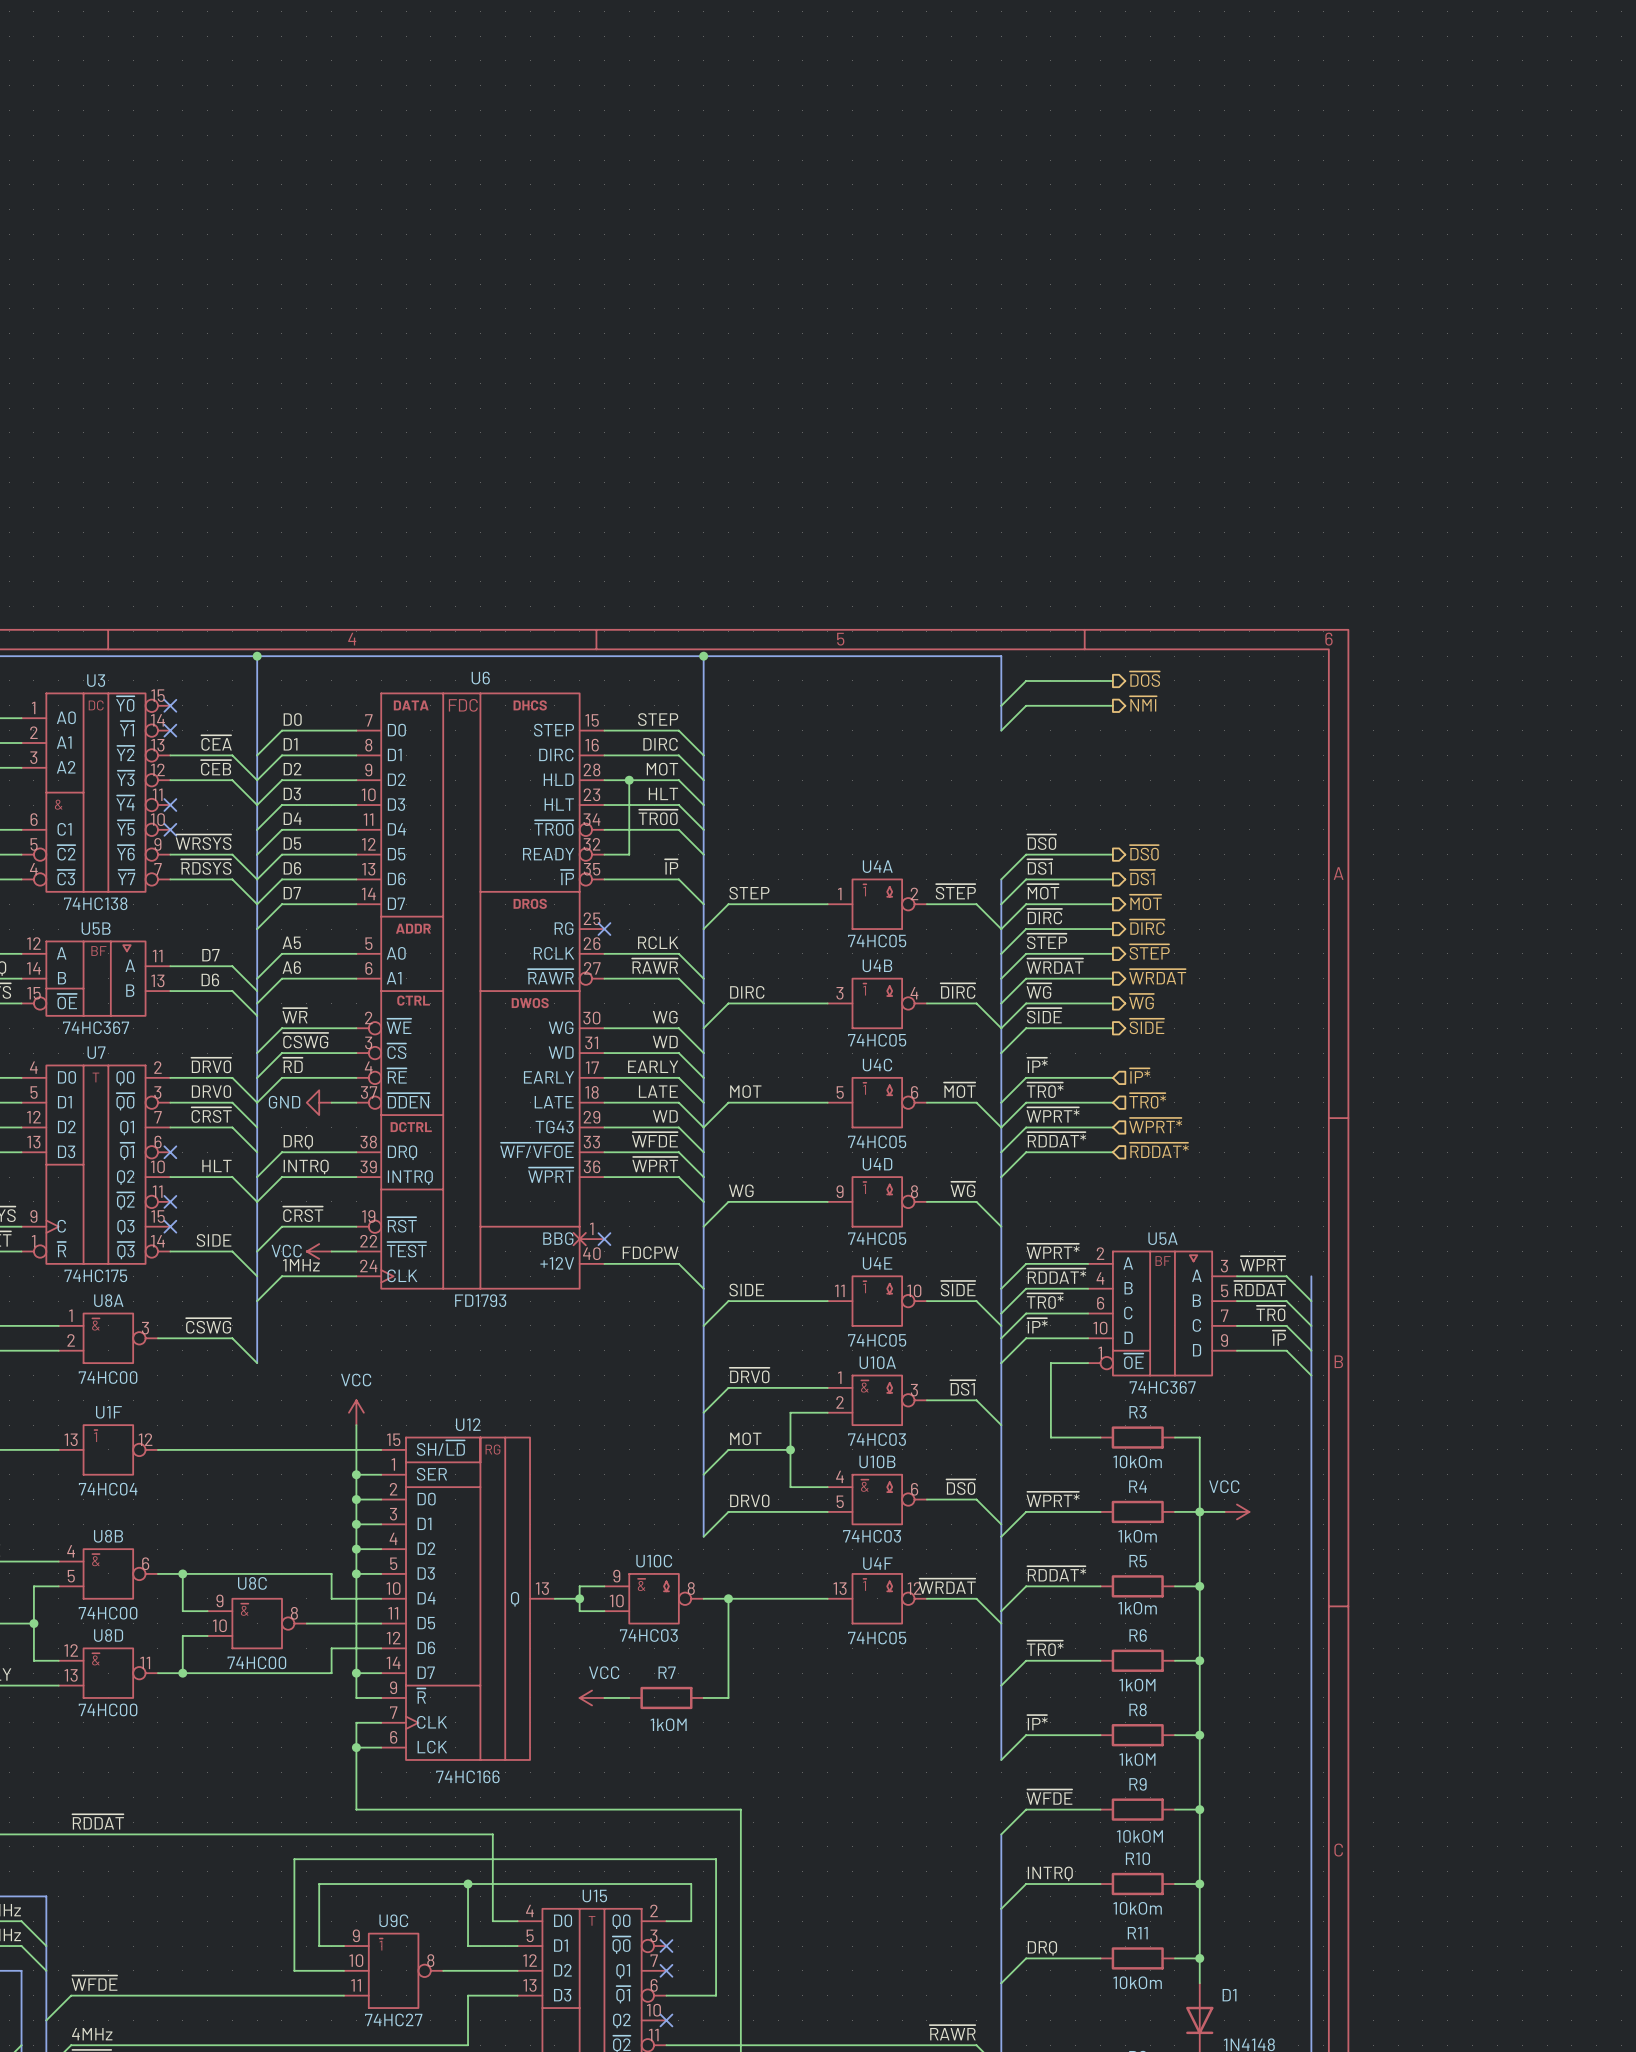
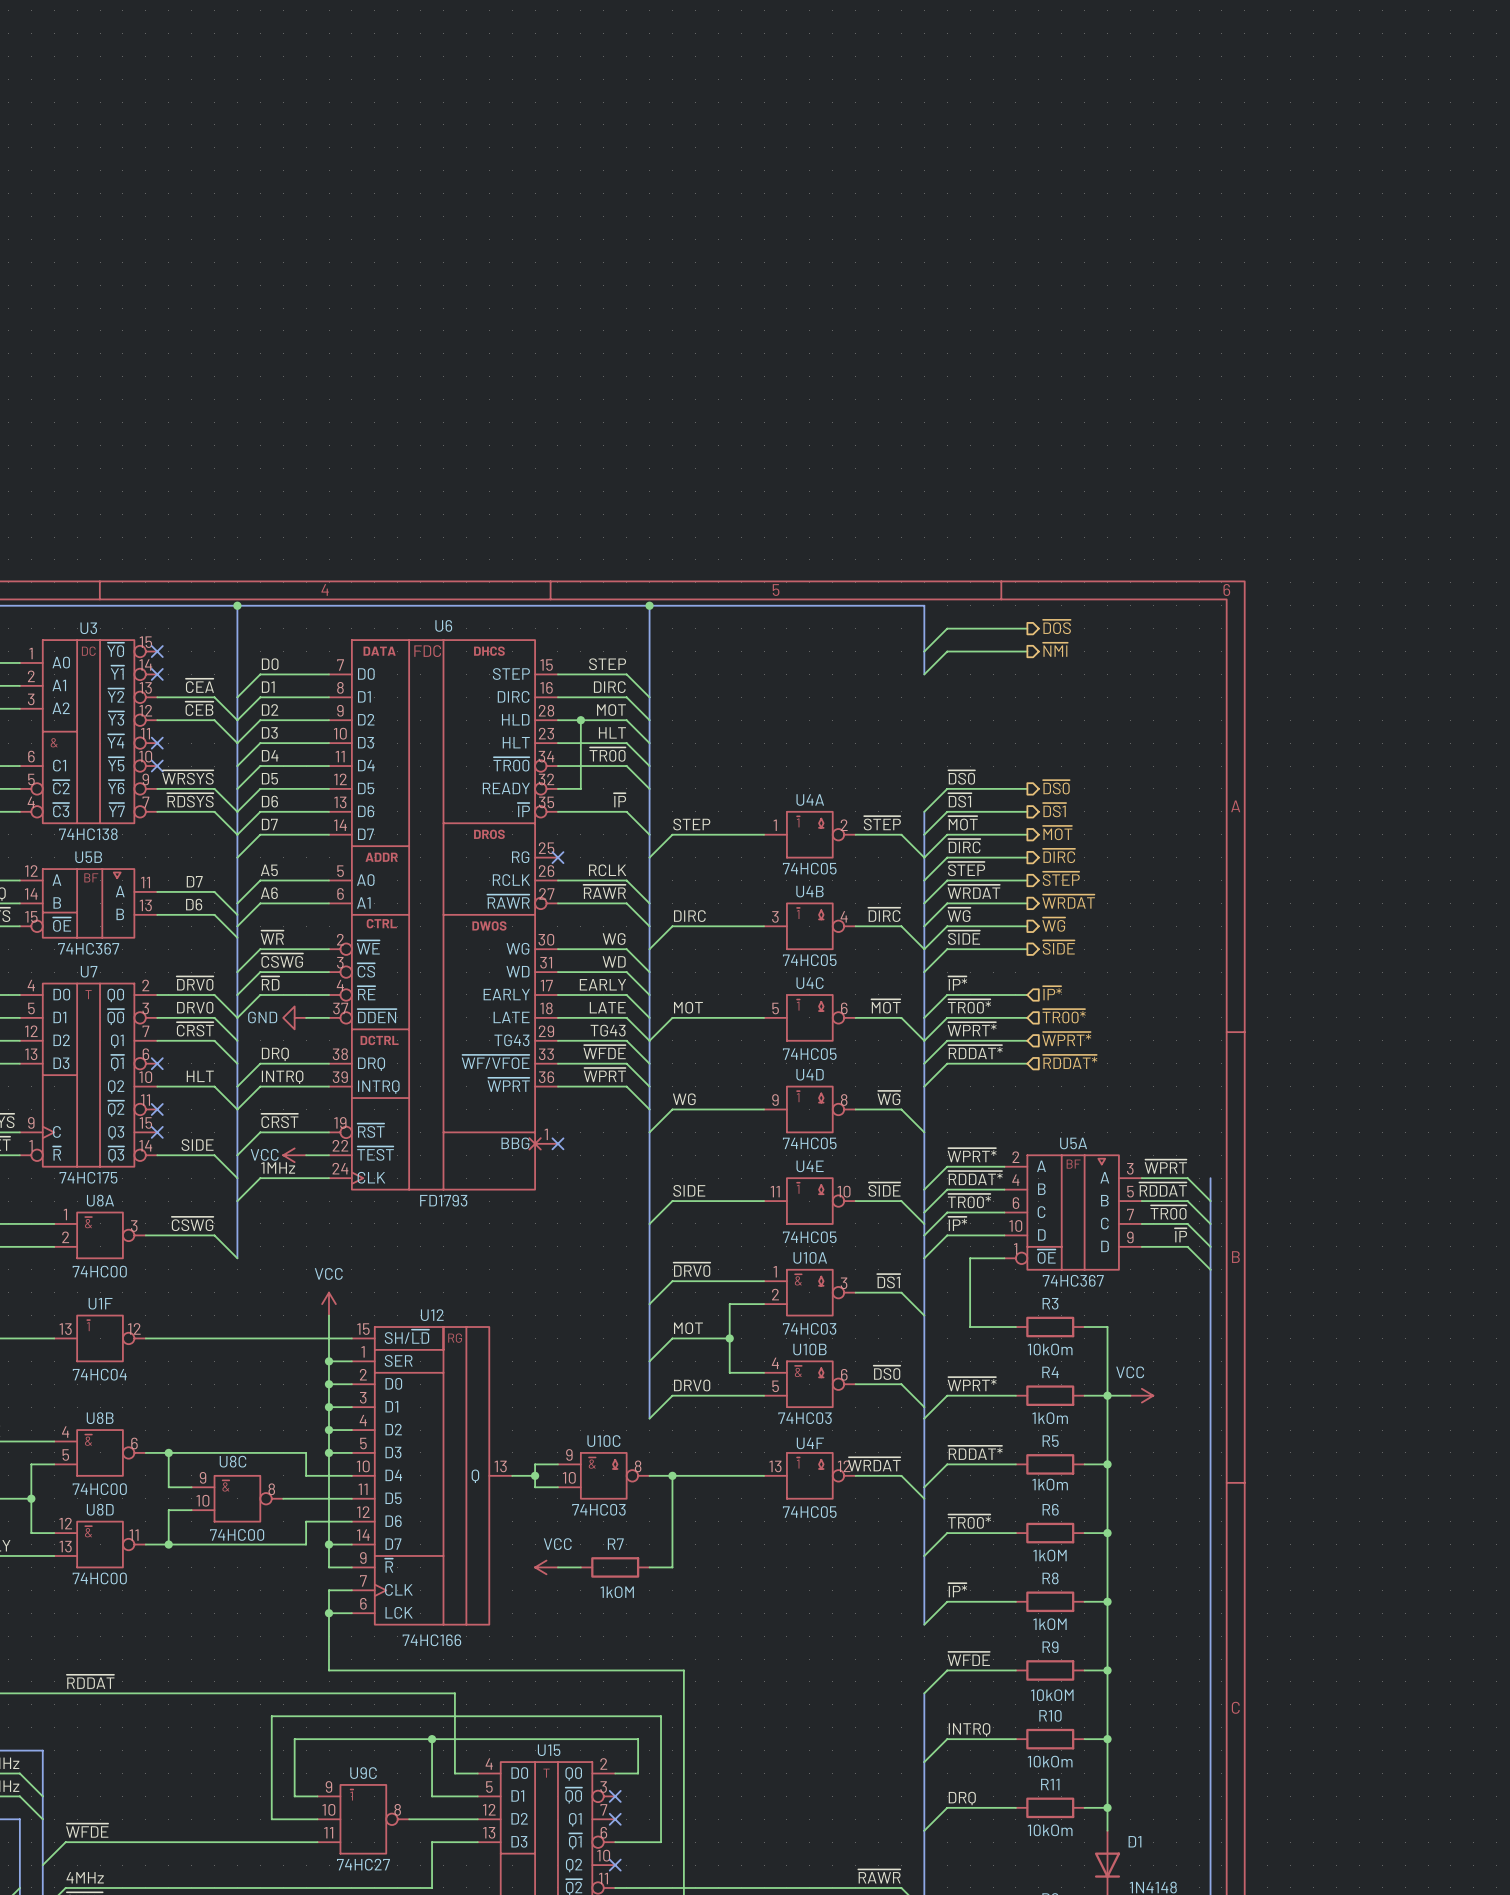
U6 symbol: [356, 693, 605, 1289] -> [329, 640, 558, 1190]
label: ~{TR0*} (1045, 1090) -> ~{TR00*} (969, 1006)
hierarchical label: ~{TR0*} (1147, 1100) -> ~{TR00*} (1064, 1016)
label: WD (665, 1116) -> TG43 (608, 1030)
label: FDCPW (650, 1252) -> none
wire: (604, 1263) (678, 1263) (703, 1288) -> none
label: ~{TR0*} (1045, 1301) -> ~{TR00*} (969, 1201)
label: ~{TR0} (1270, 1313) -> ~{TR00} (1168, 1212)
label: ~{TR0*} (1045, 1648) -> ~{TR00*} (969, 1521)

